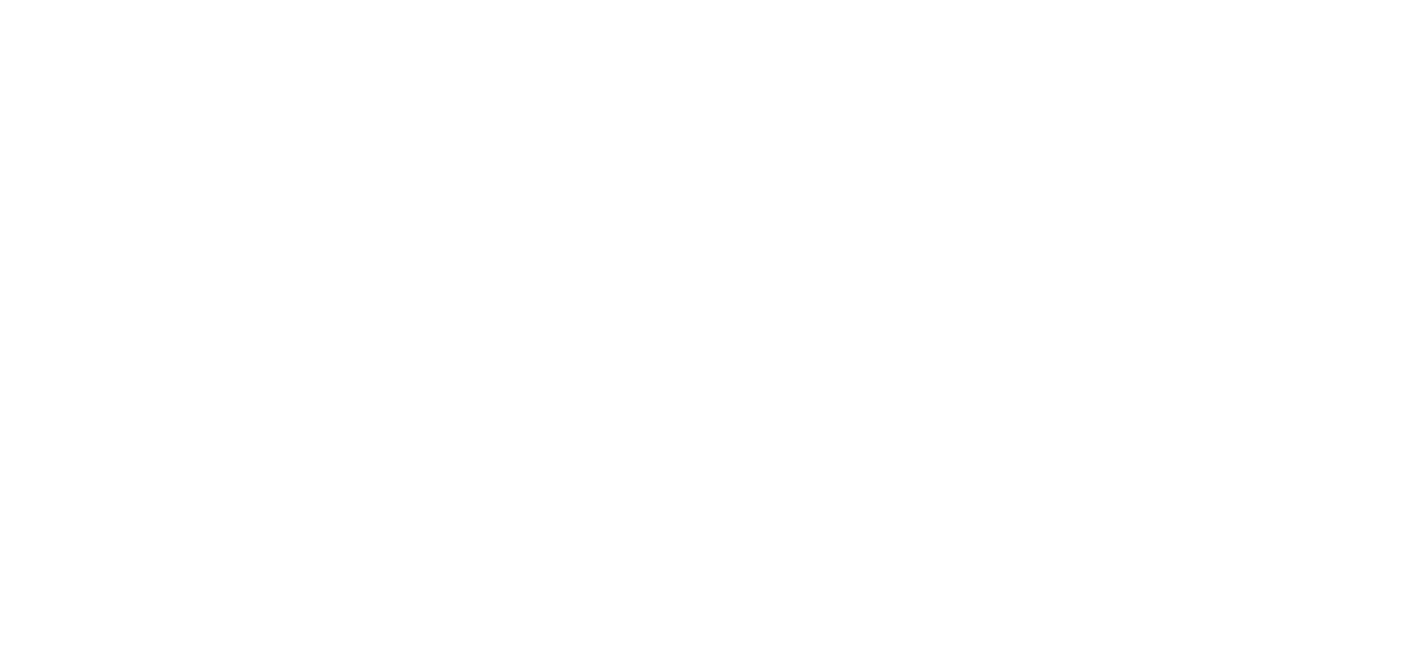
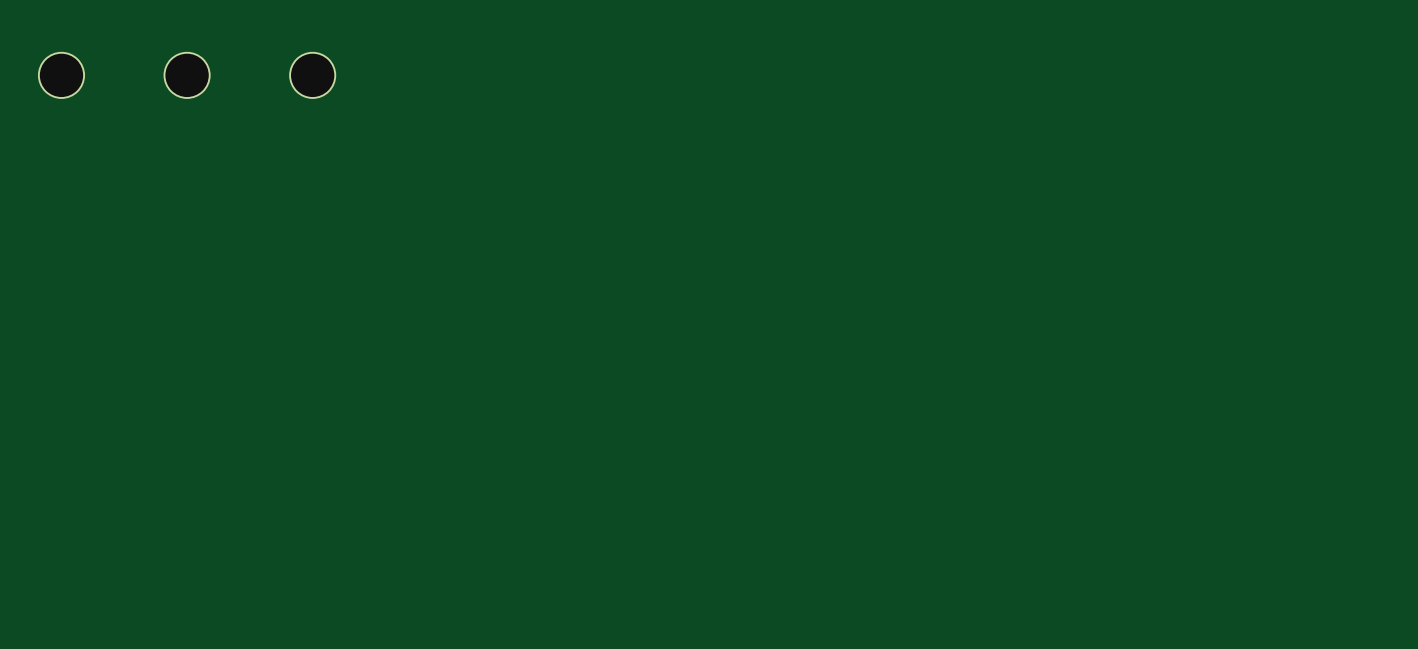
part: none -> (61, 75)
part: none -> (187, 75)
part: none -> (312, 75)

